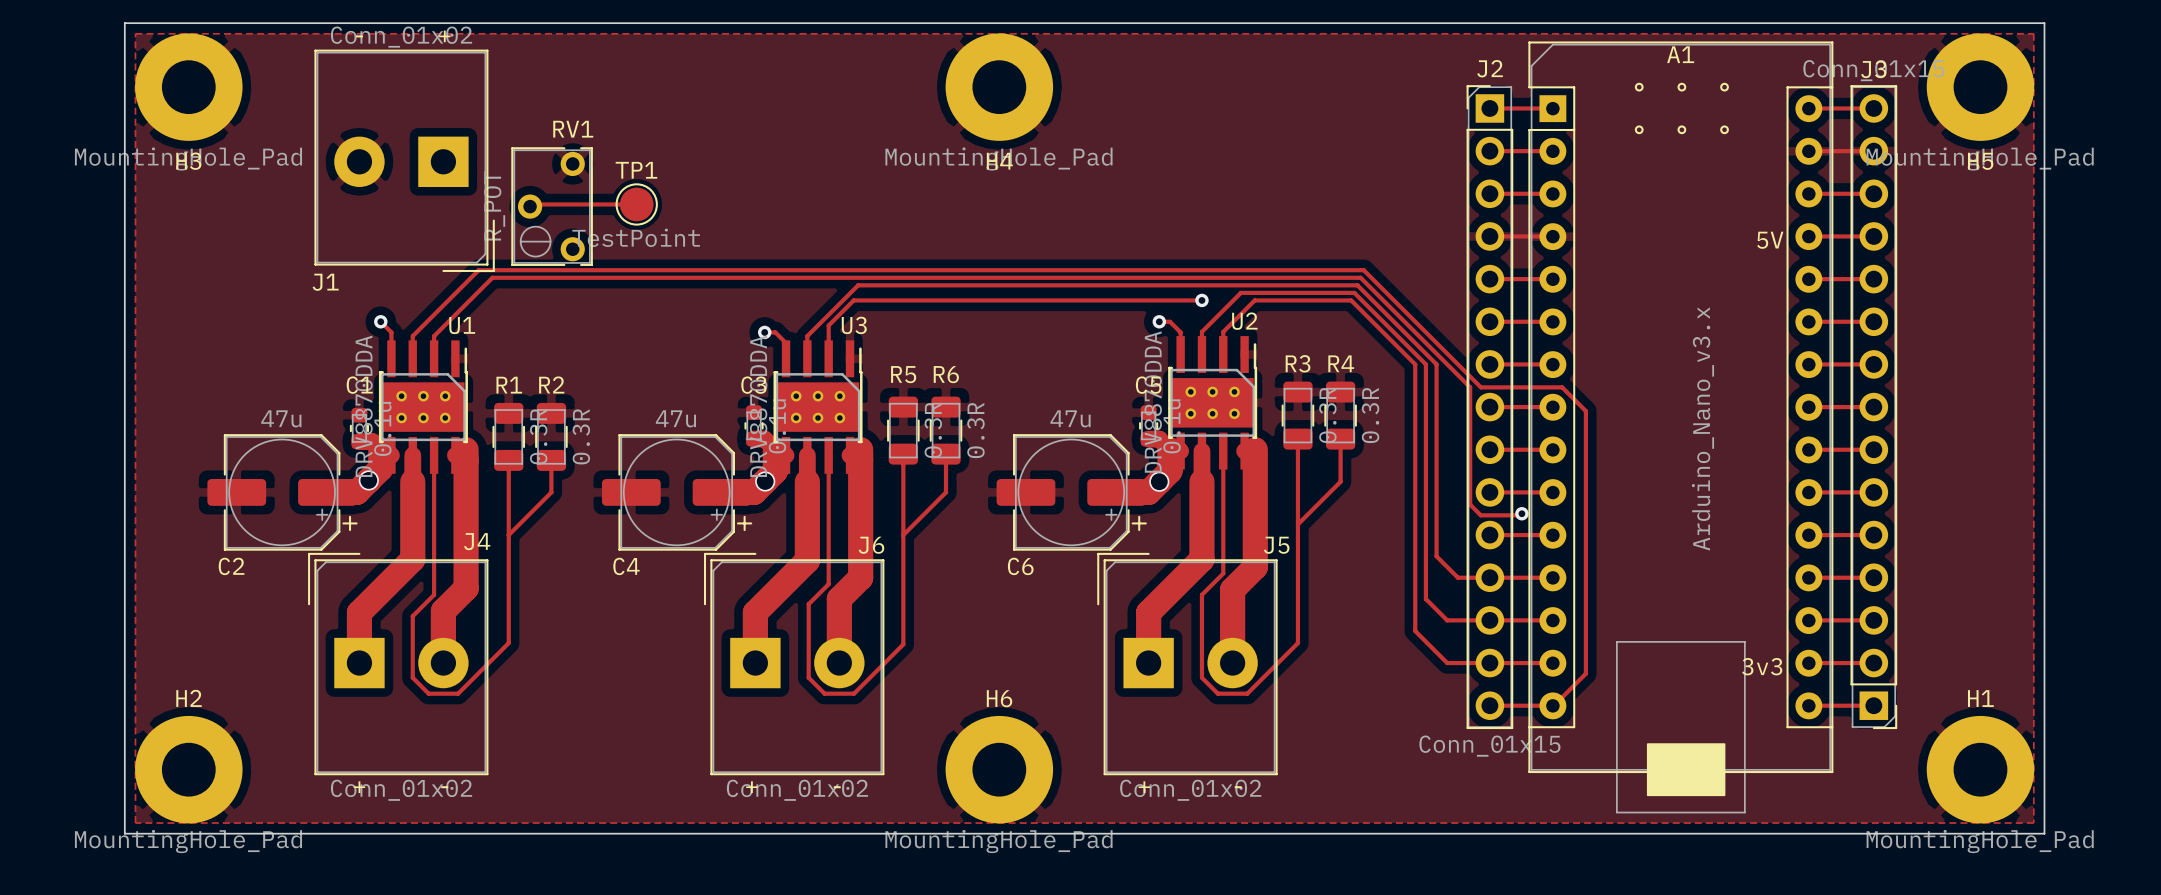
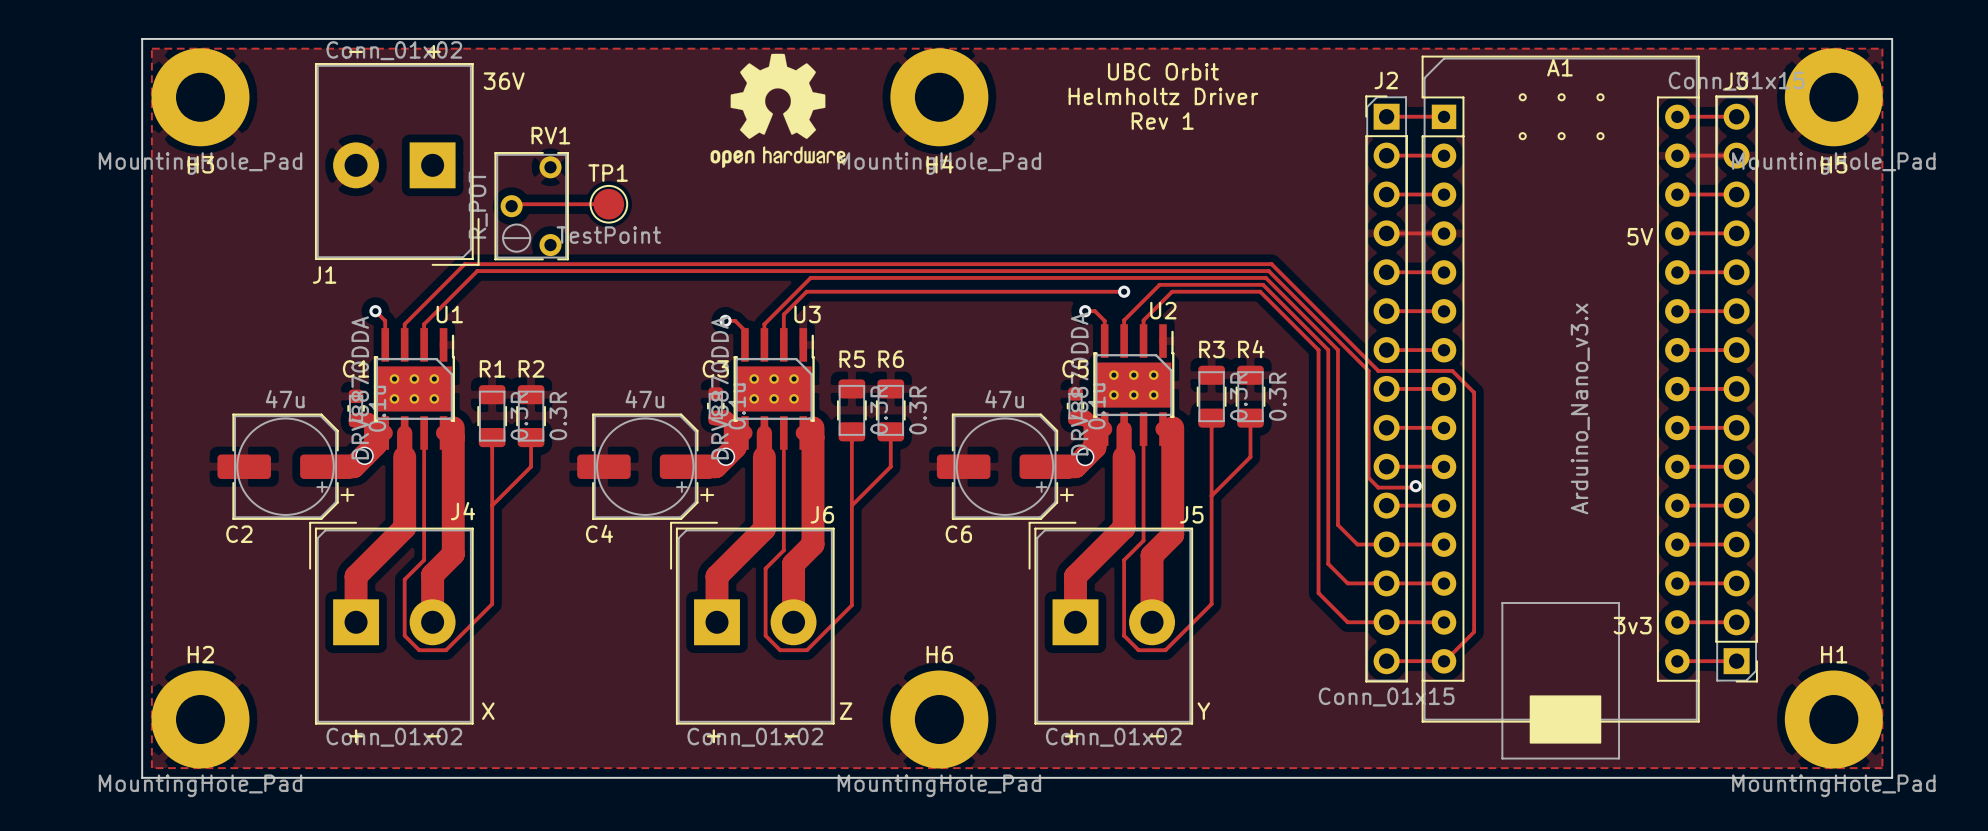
drawing: none -> [710, 53, 846, 168]
text: none -> UBC Orbit (1163, 71)
text: none -> 36V (504, 81)
text: none -> Helmholtz Driver (1163, 96)
text: none -> Rev 1 (1162, 121)
text: none -> X (488, 711)
text: none -> Z (846, 711)
text: none -> Y (1203, 711)

